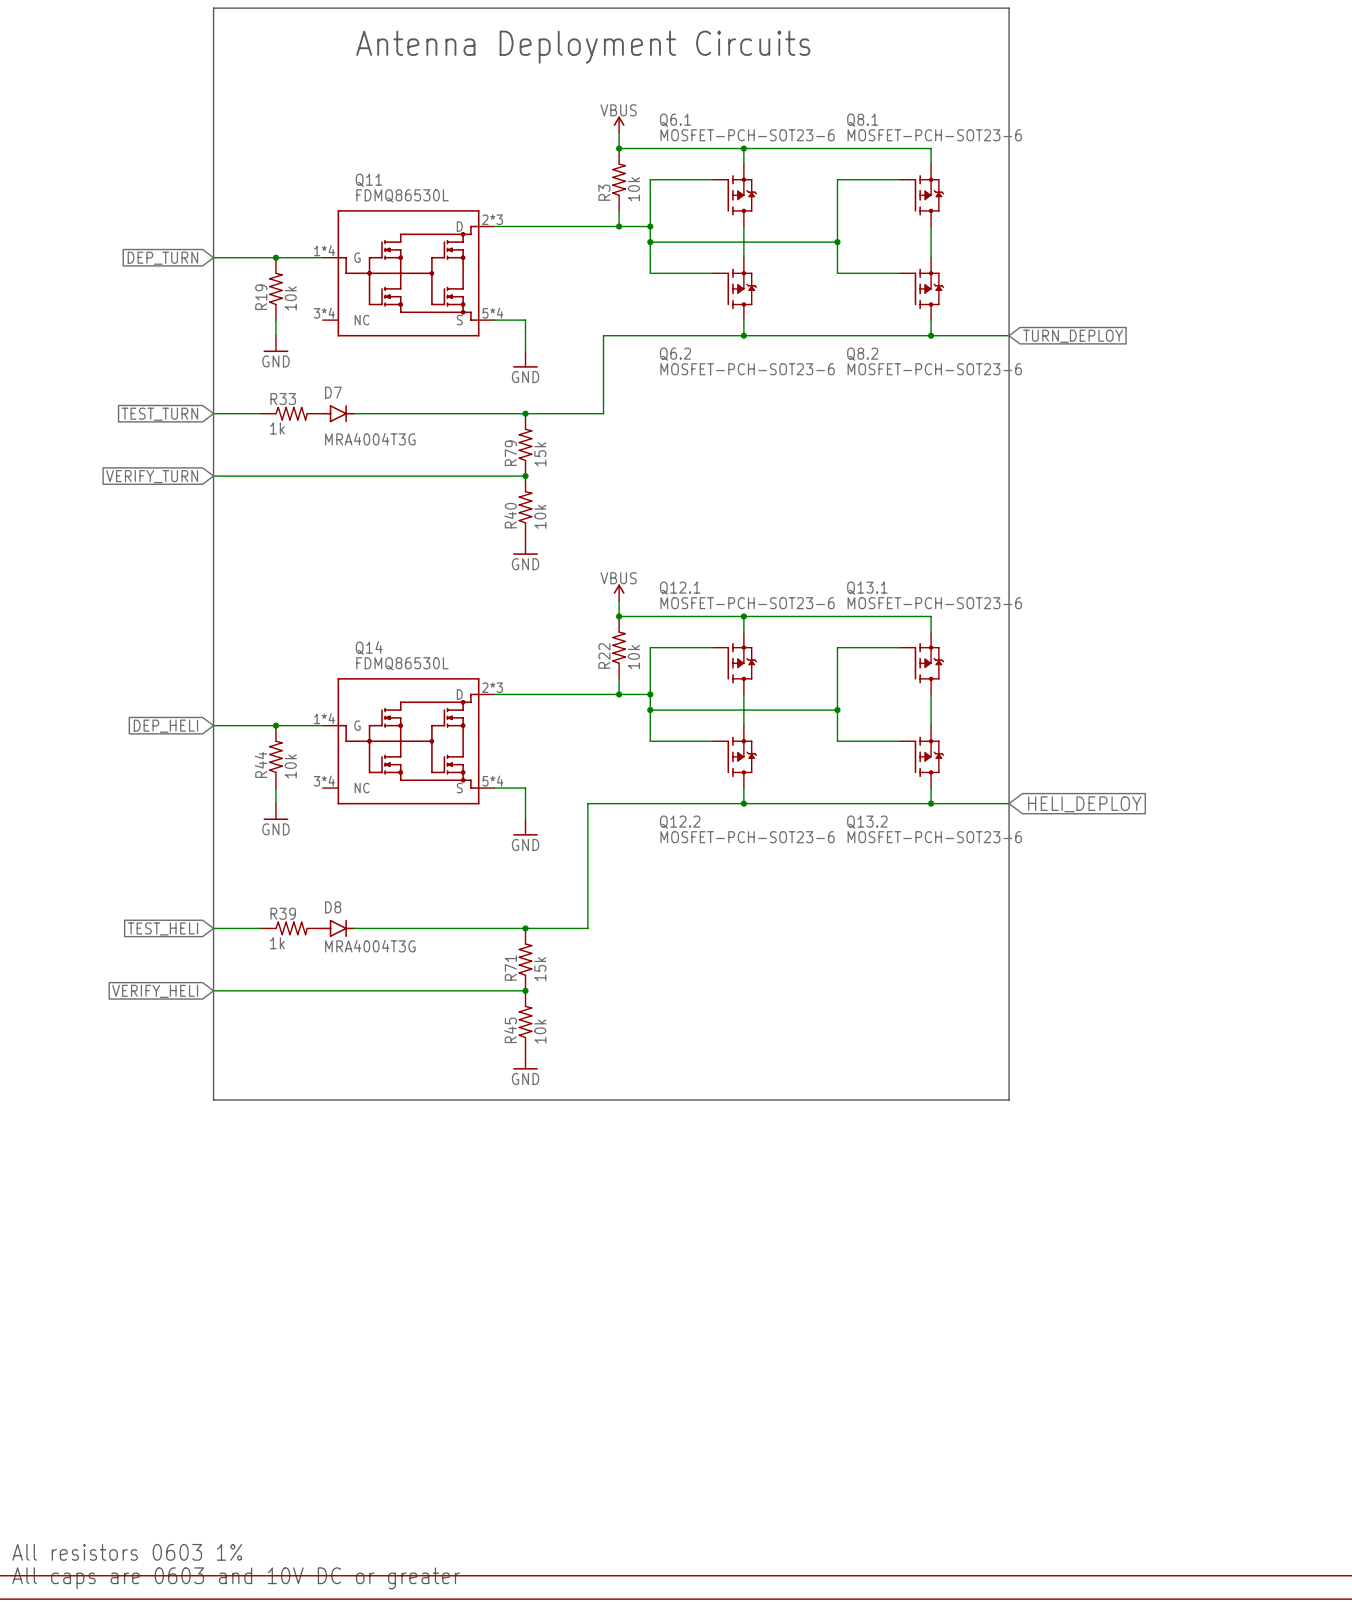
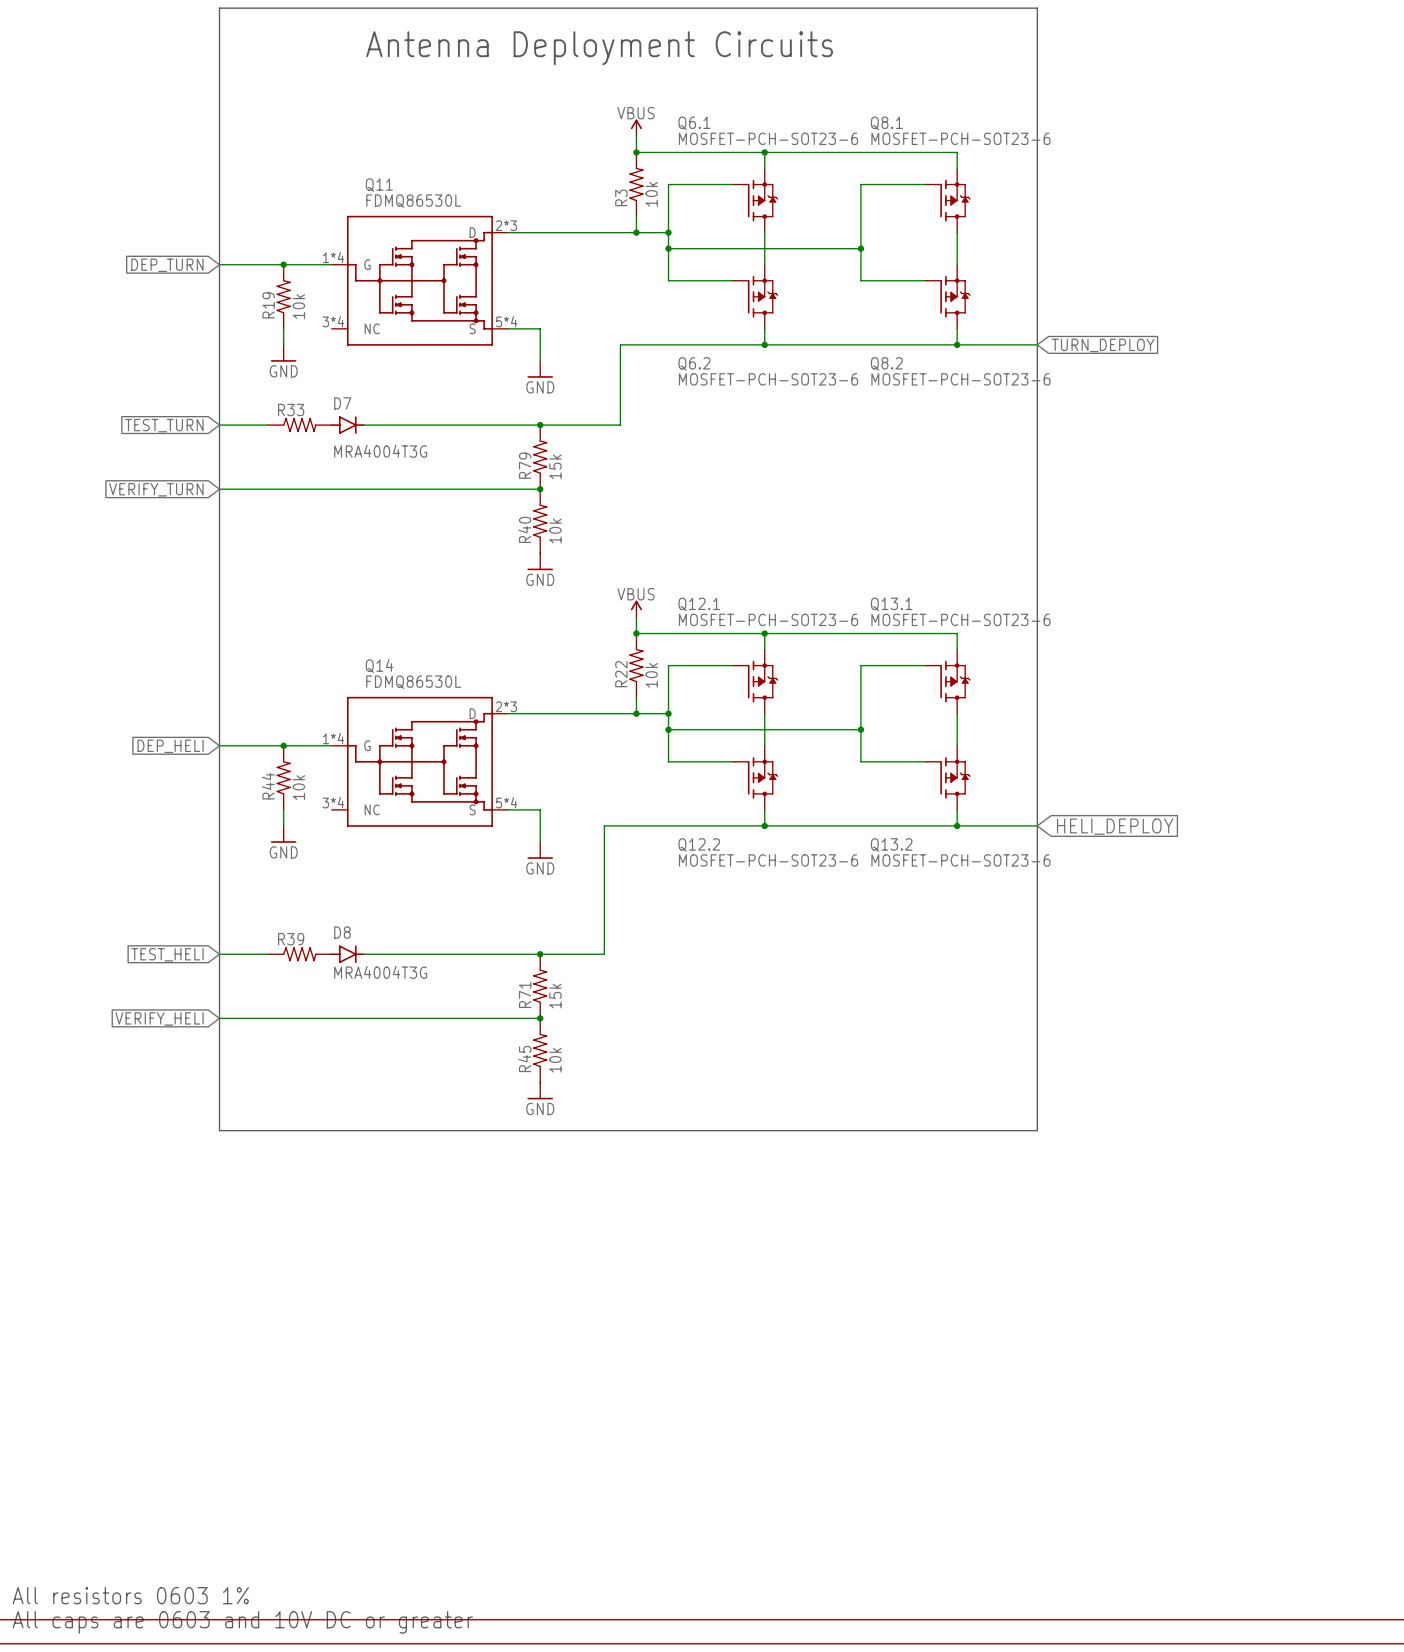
R33 value: 1k (277, 428) -> none
R39 value: 1k (277, 943) -> none

